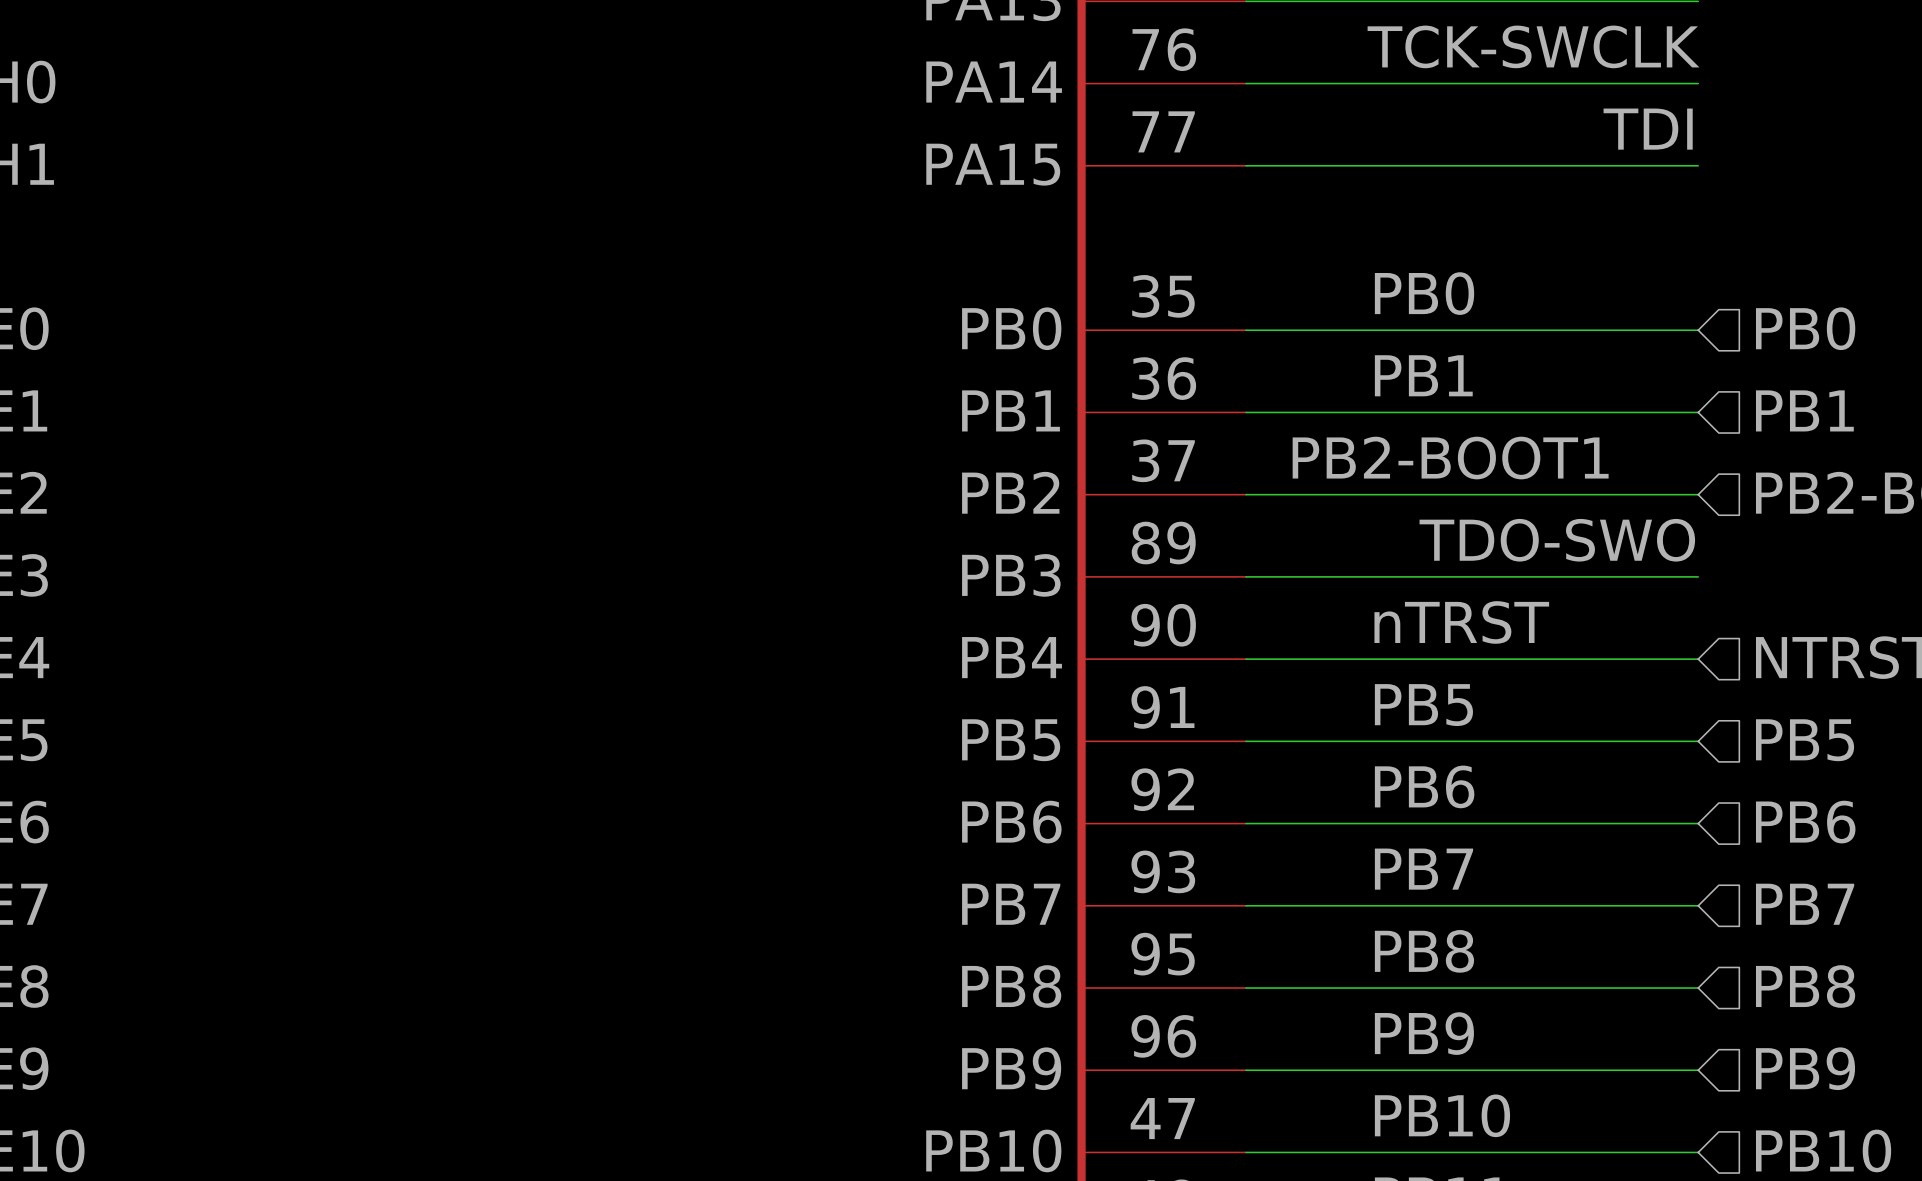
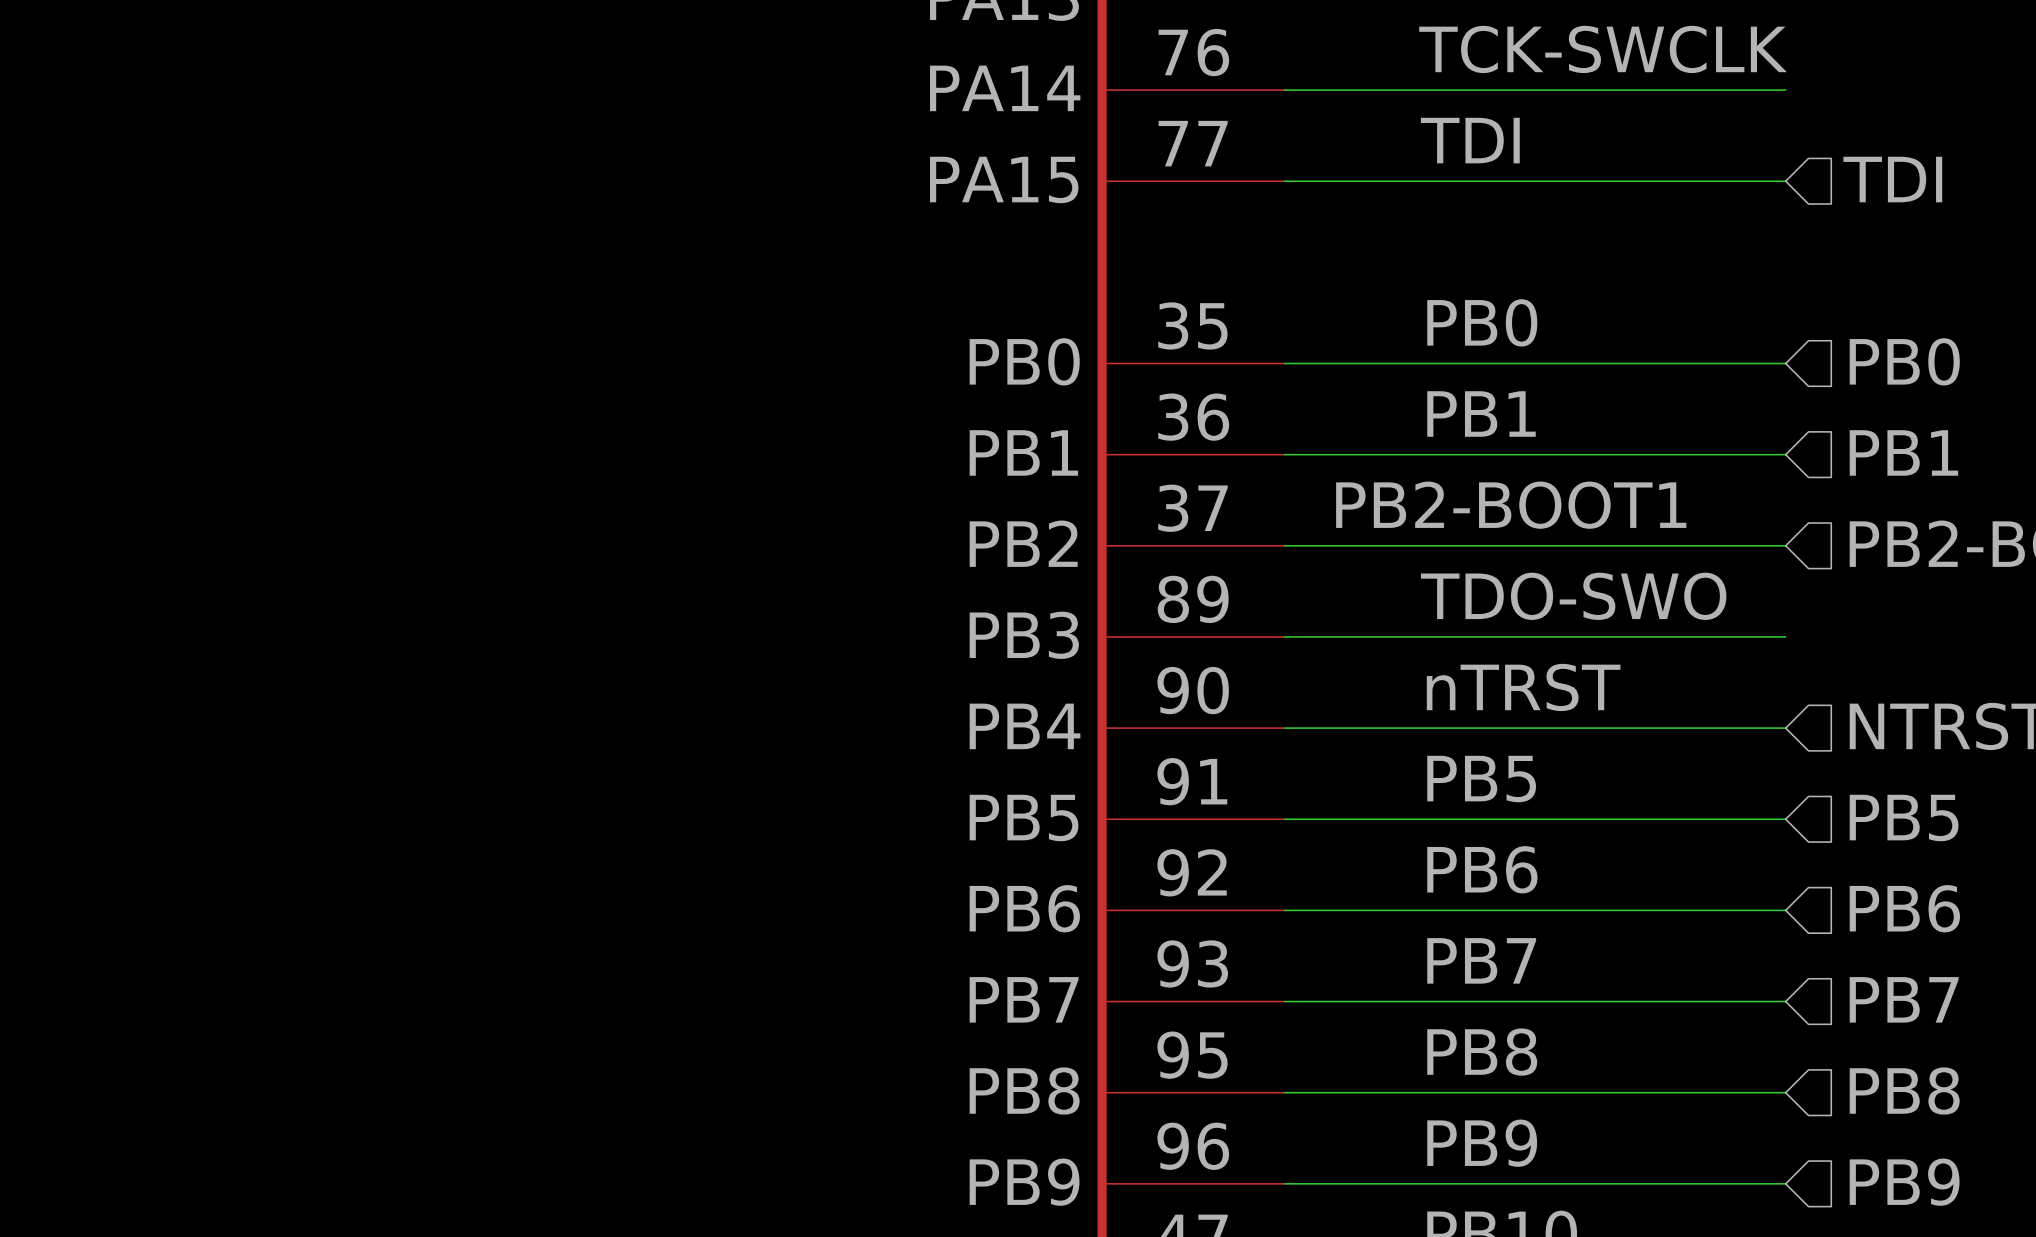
label position: TDI (1648, 129) -> TDI (1470, 140)
hierarchical label: none -> TDI (1892, 179)
label position: TDO-SWO (1557, 540) -> TDO-SWO (1573, 596)

